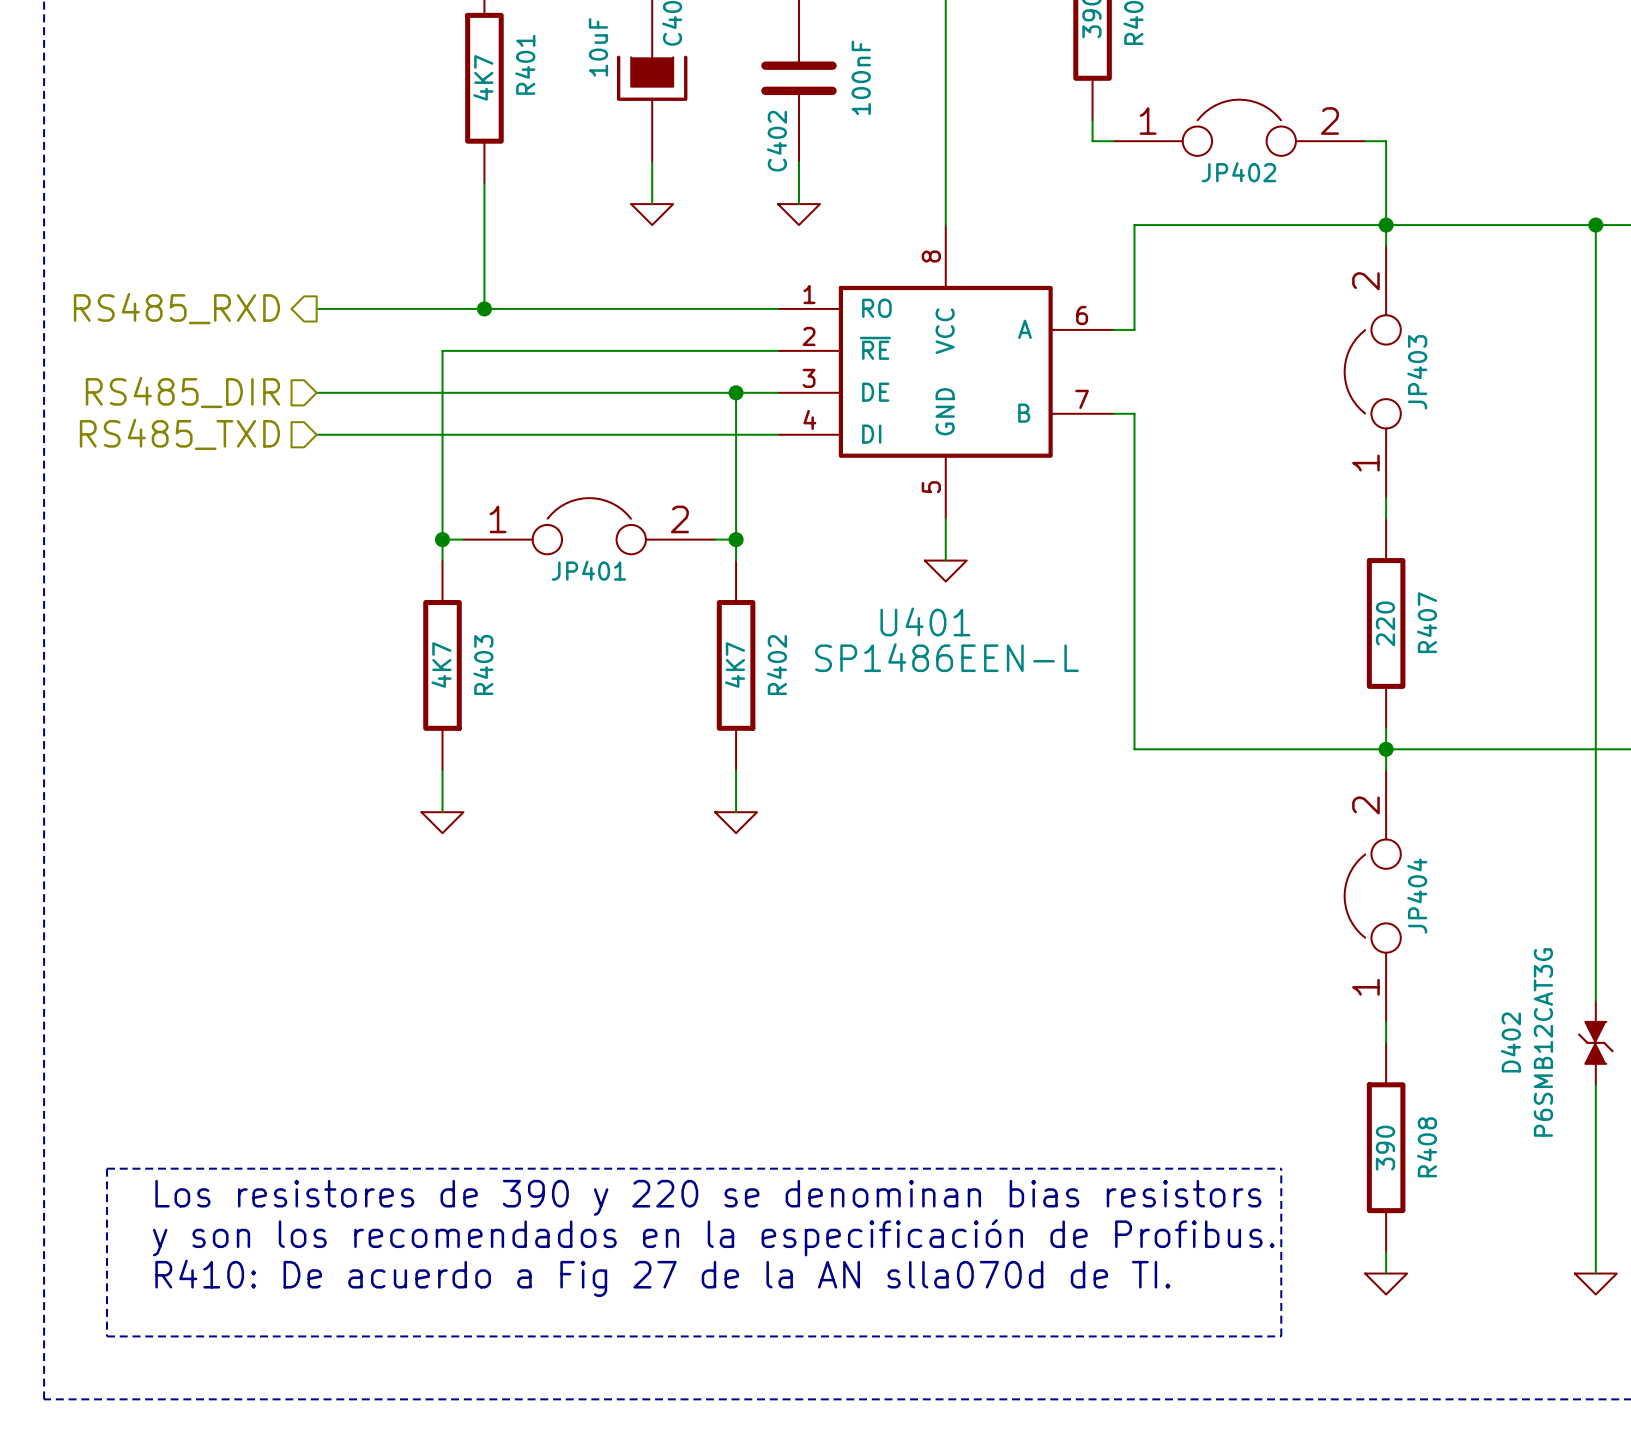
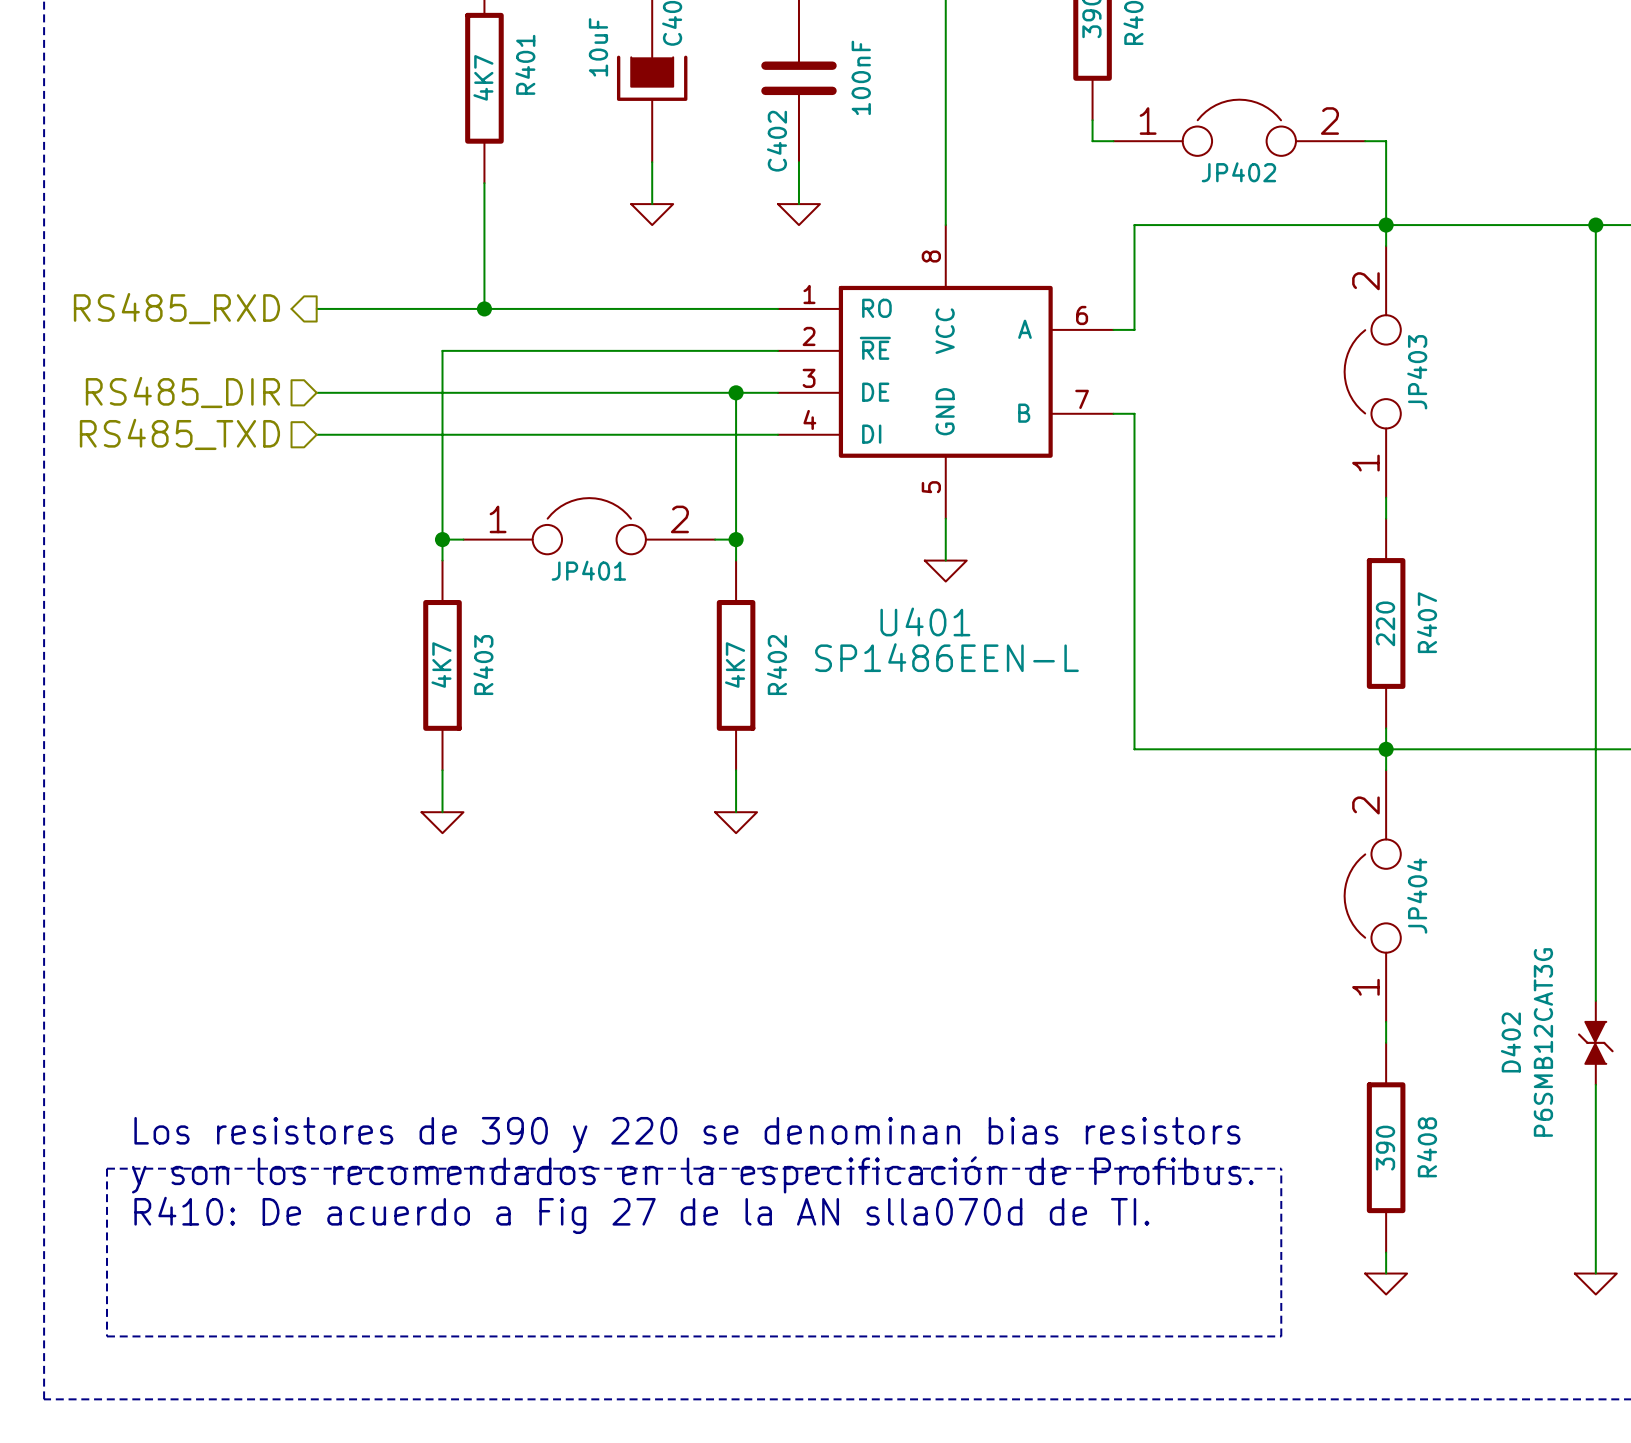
text position: Los resistores de 390 y 220 se denominan bias resistors (708, 1197) -> Los resistores de 390 y 220 se denominan bias resistors (687, 1134)
text position: y son los recomendados en la especificación de Profibus. (713, 1237) -> y son los recomendados en la especificación de Profibus. (692, 1174)
text position: R410: De acuerdo a Fig 27 de la AN slla070d de TI. (662, 1278) -> R410: De acuerdo a Fig 27 de la AN slla070d de TI. (641, 1215)

